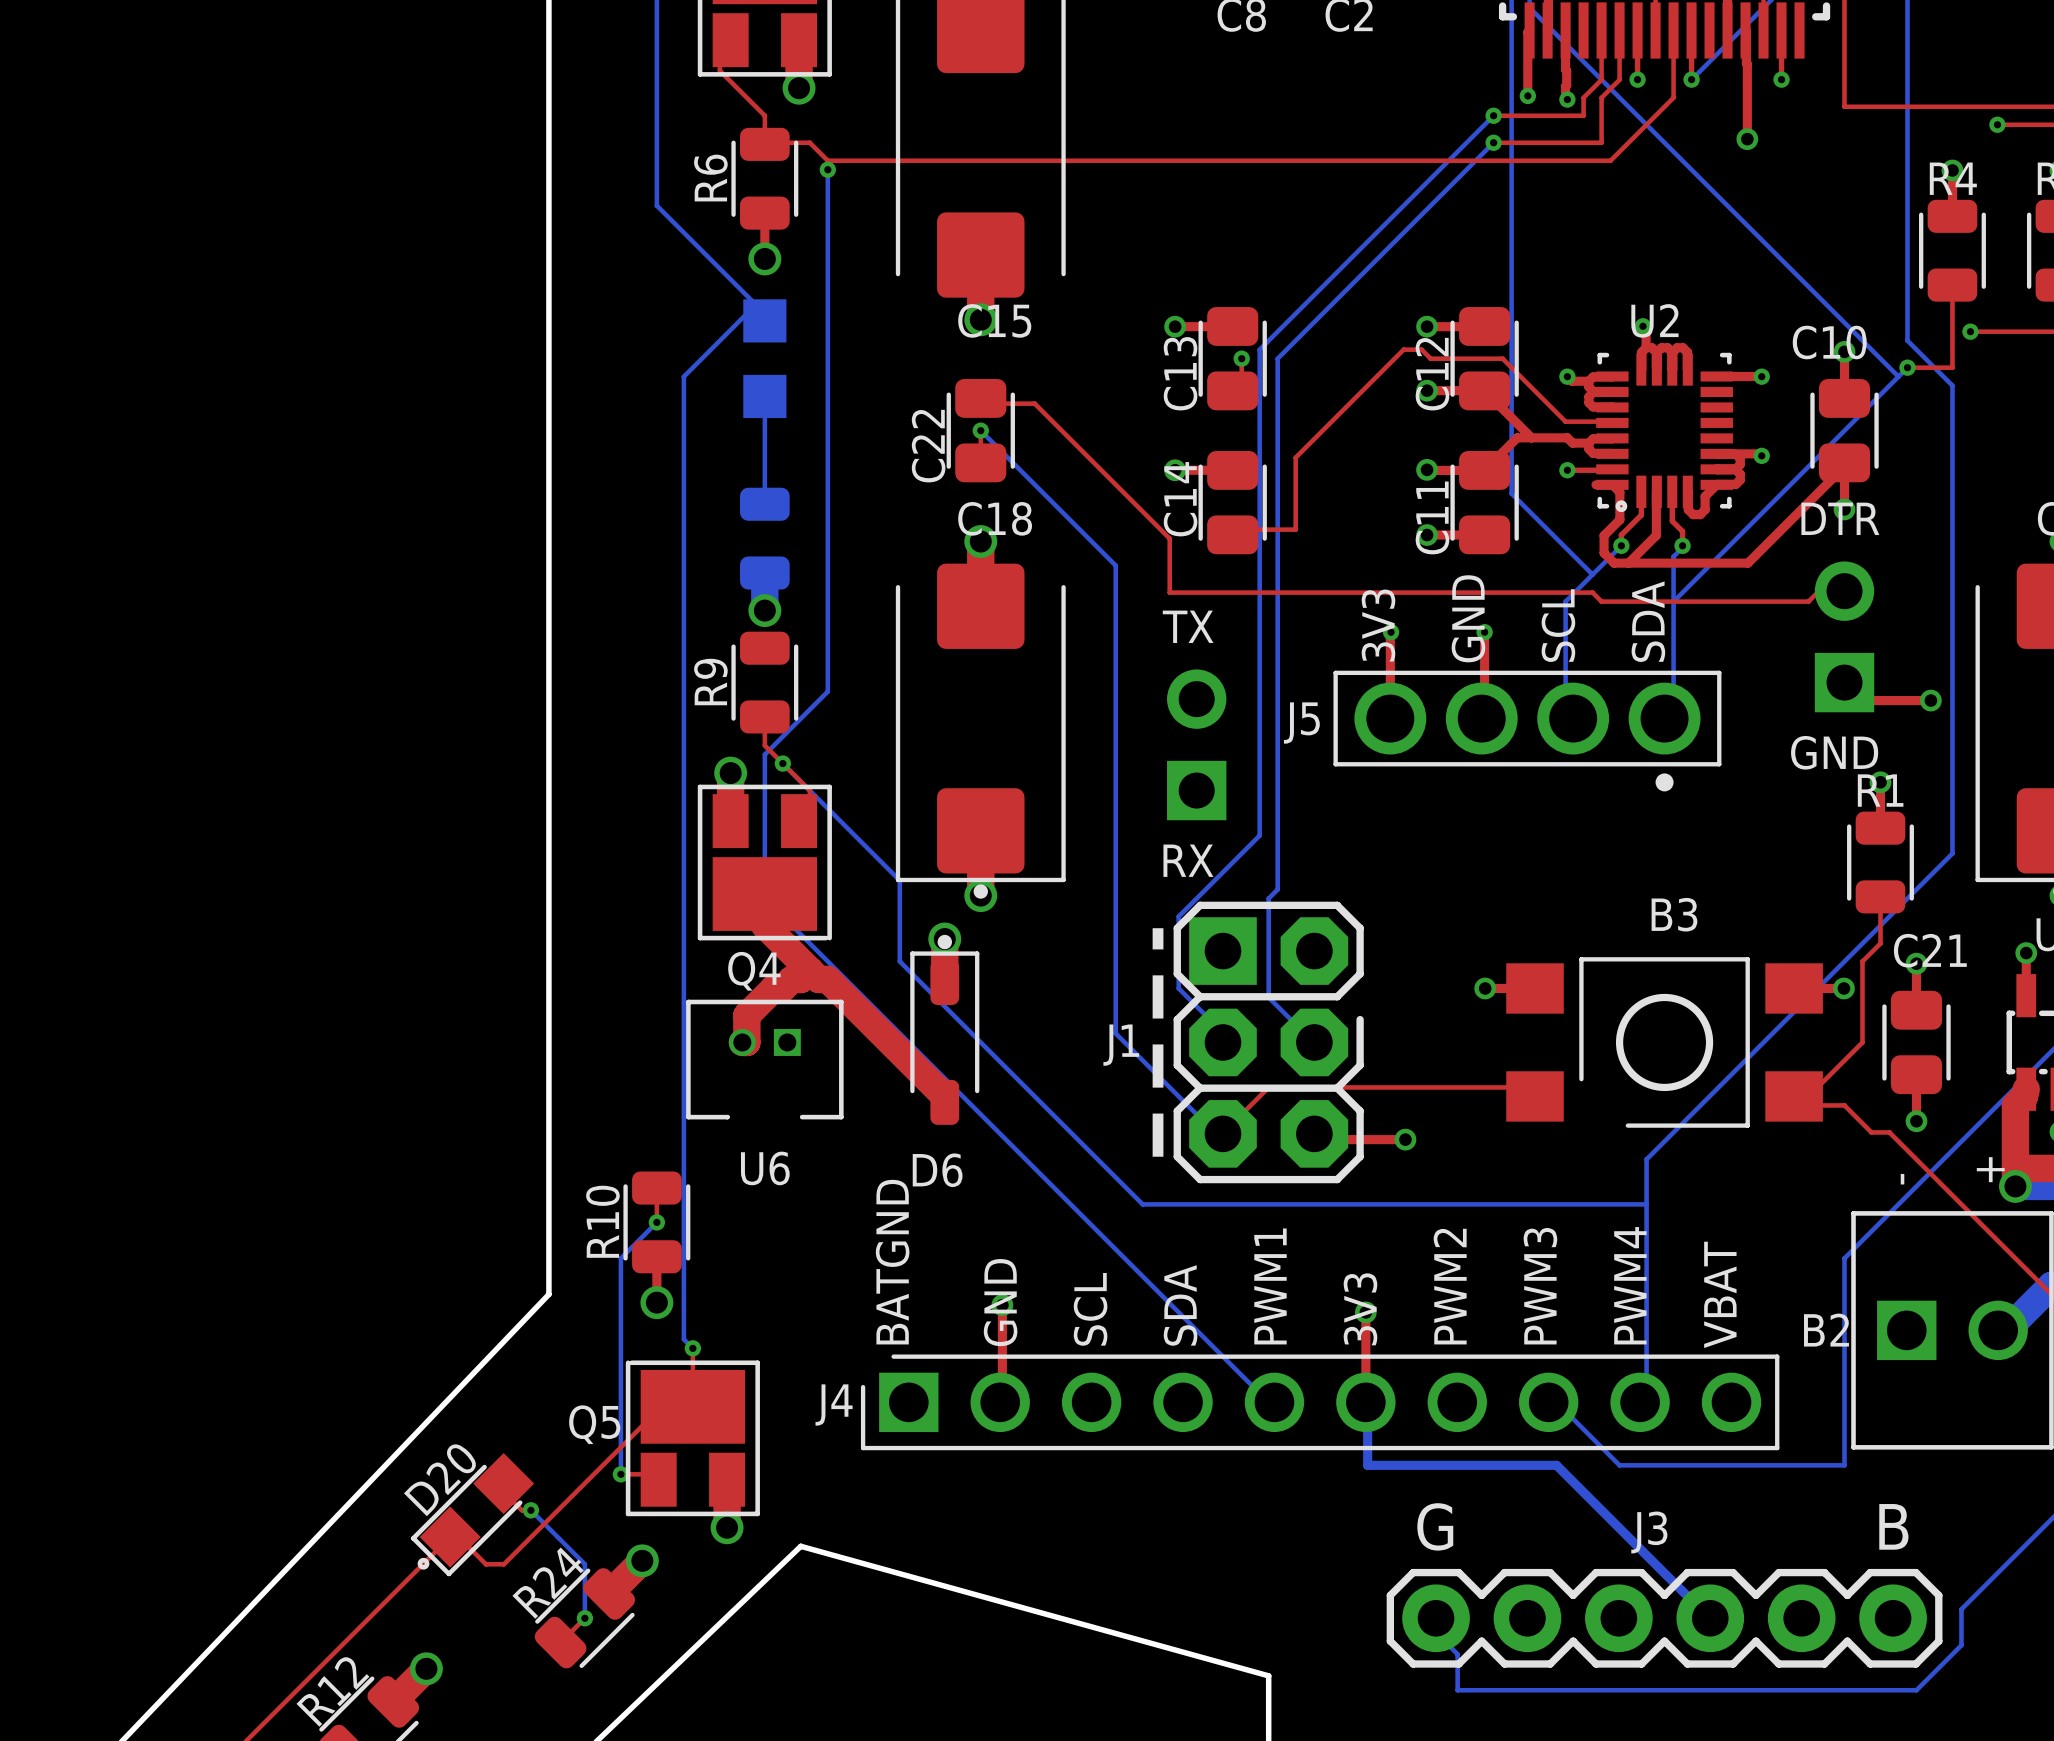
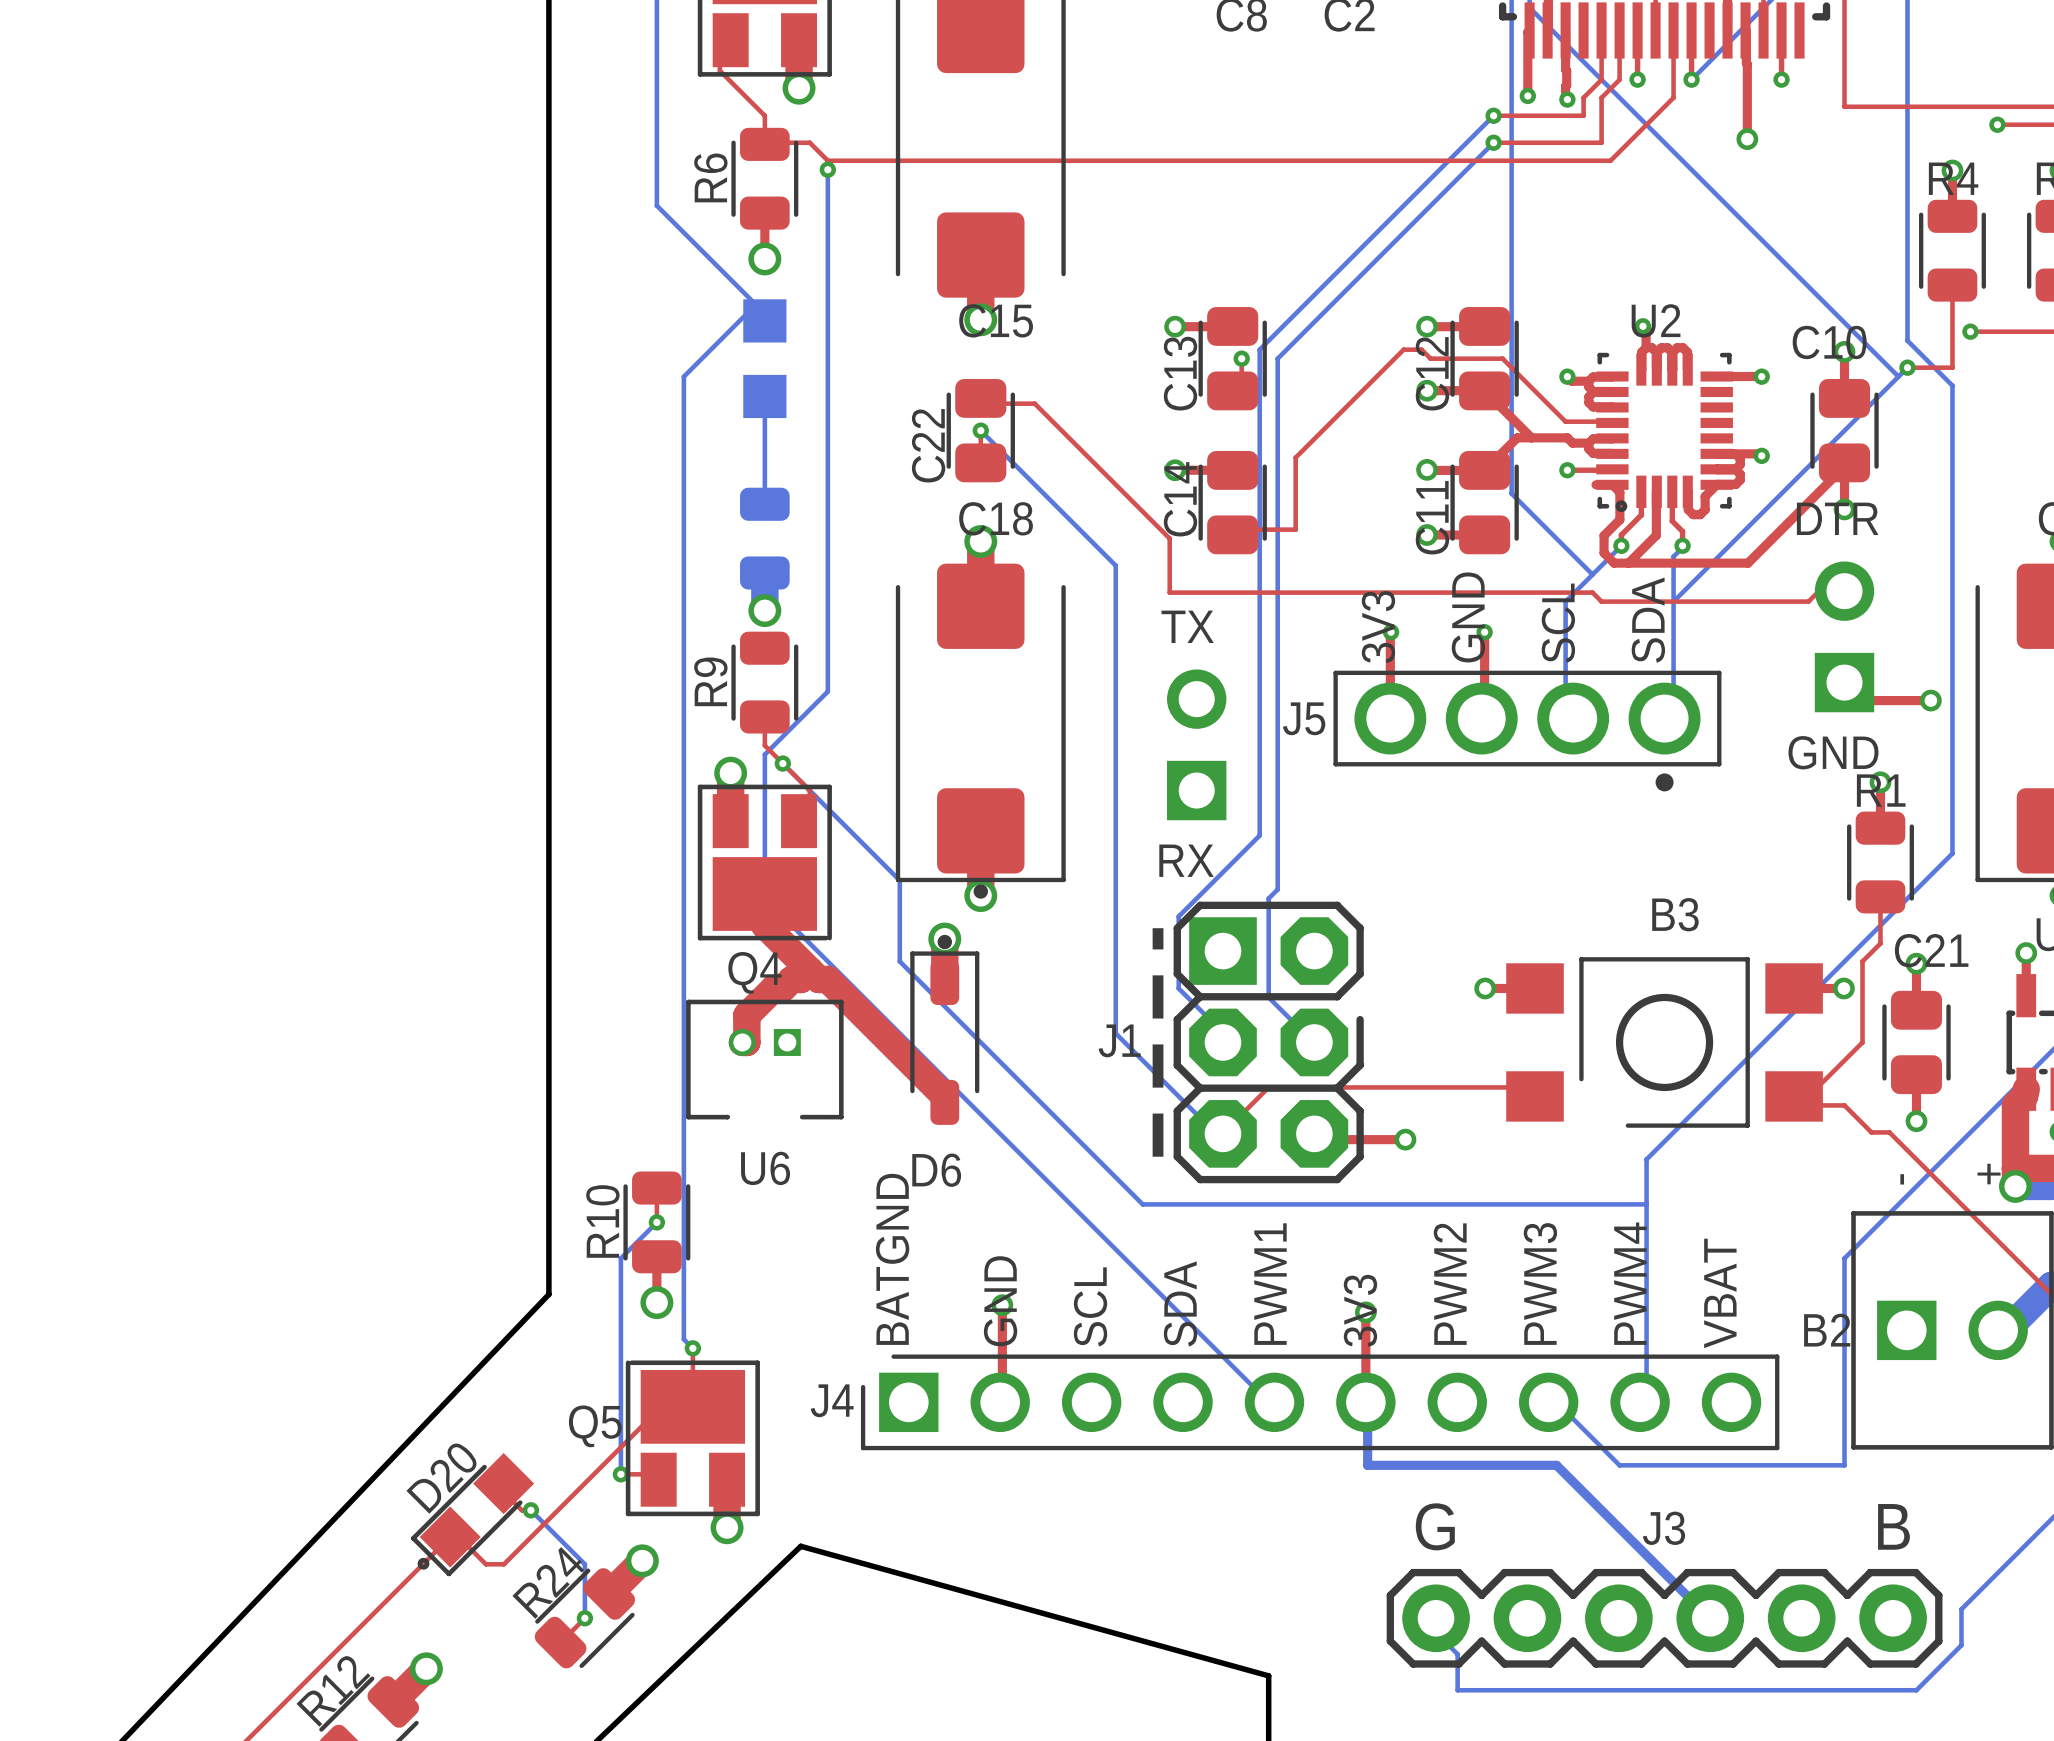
J3 name position: J3 (1649, 1532) -> J3 (1663, 1528)

